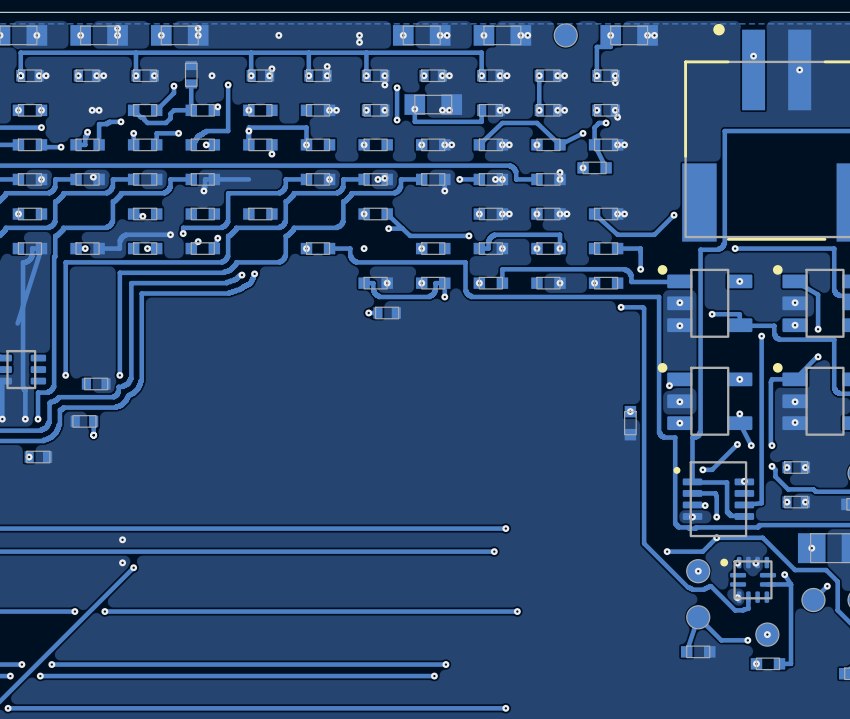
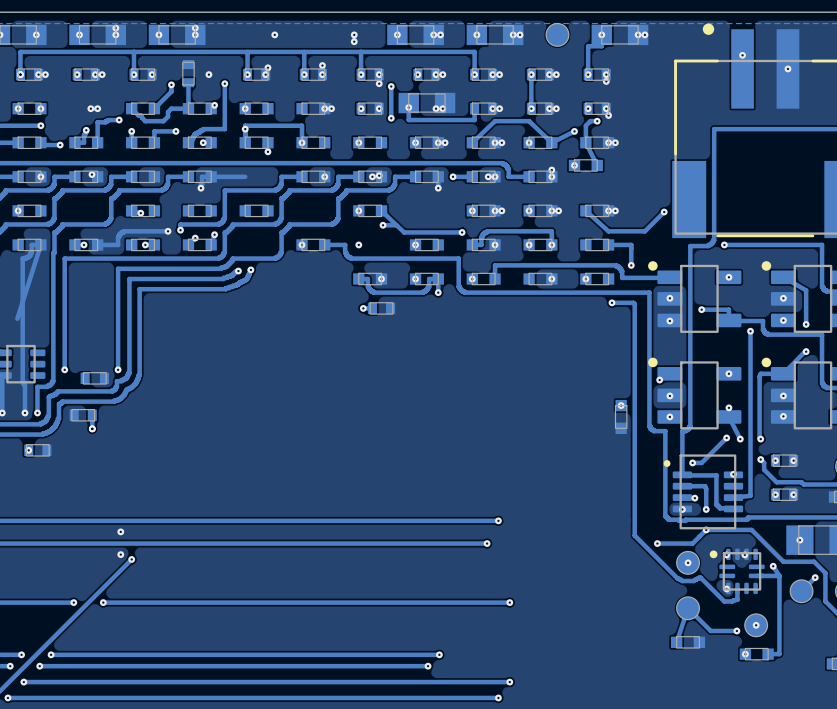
via: none -> (23, 682)
track: none -> (509, 682) (23, 682)
via: none -> (509, 682)

